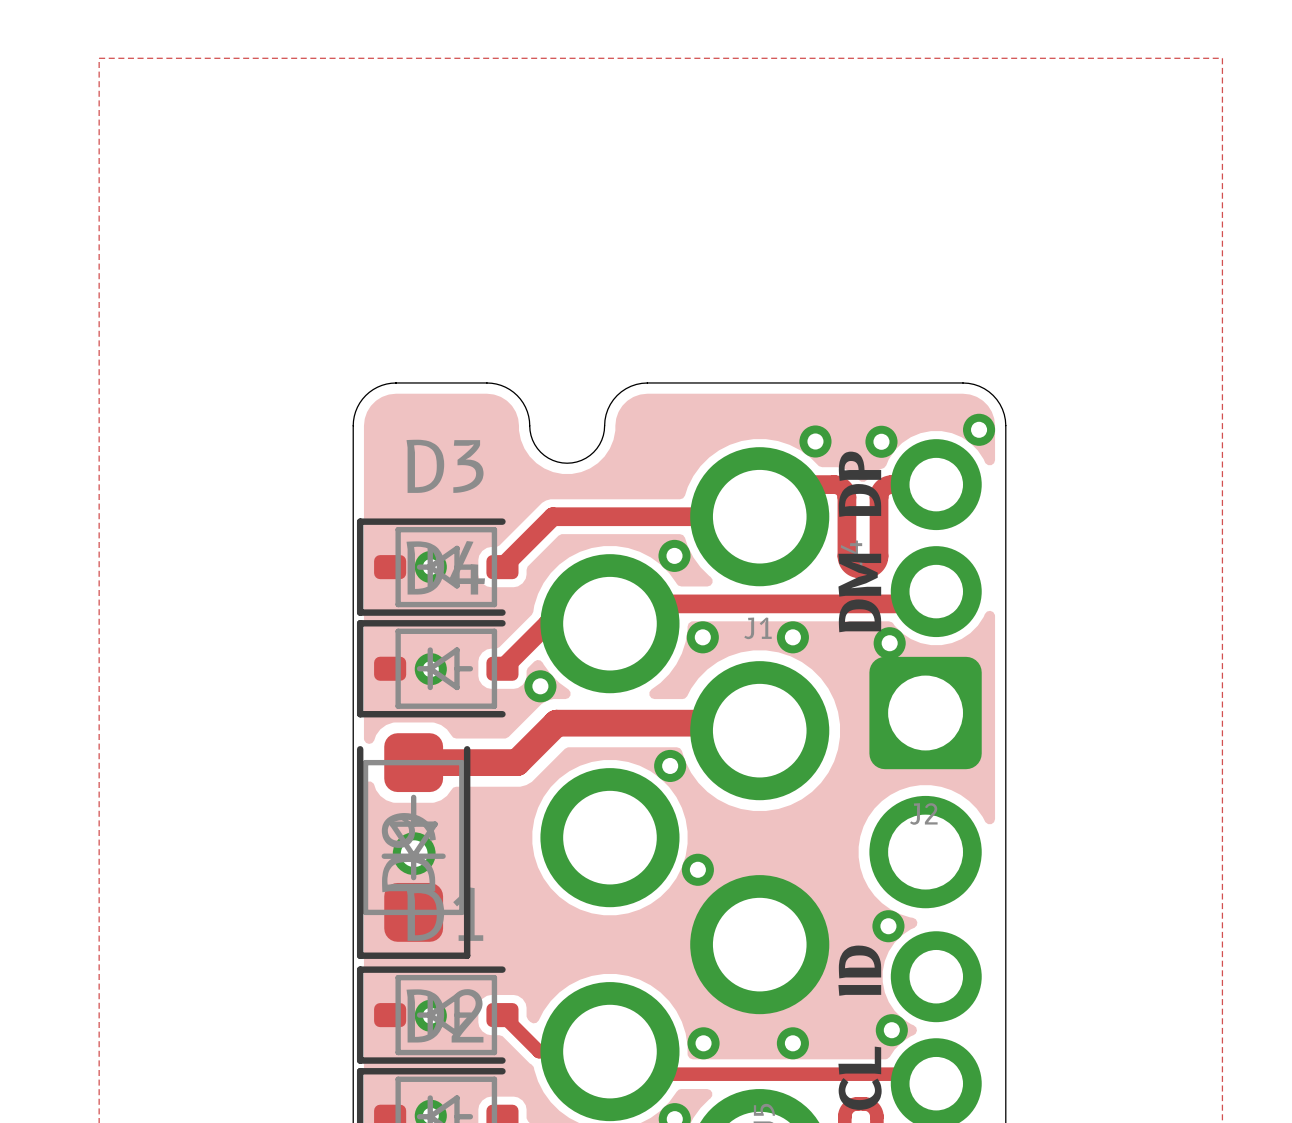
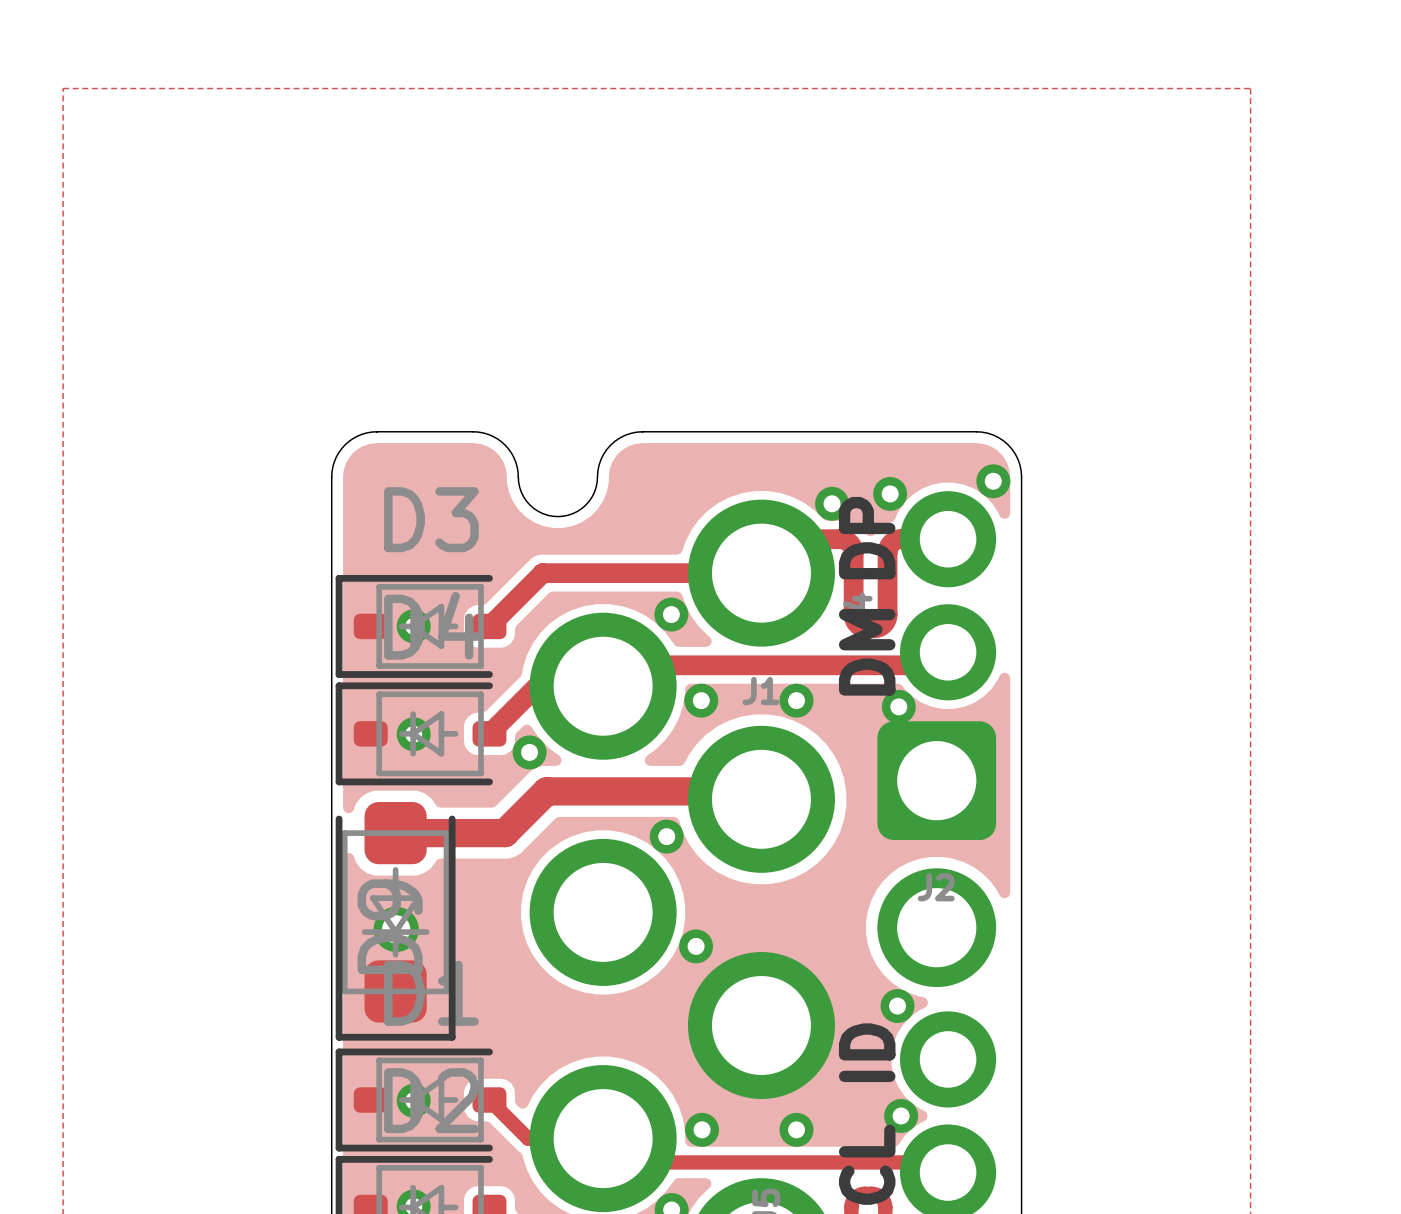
via position: (815, 441) -> (832, 503)

